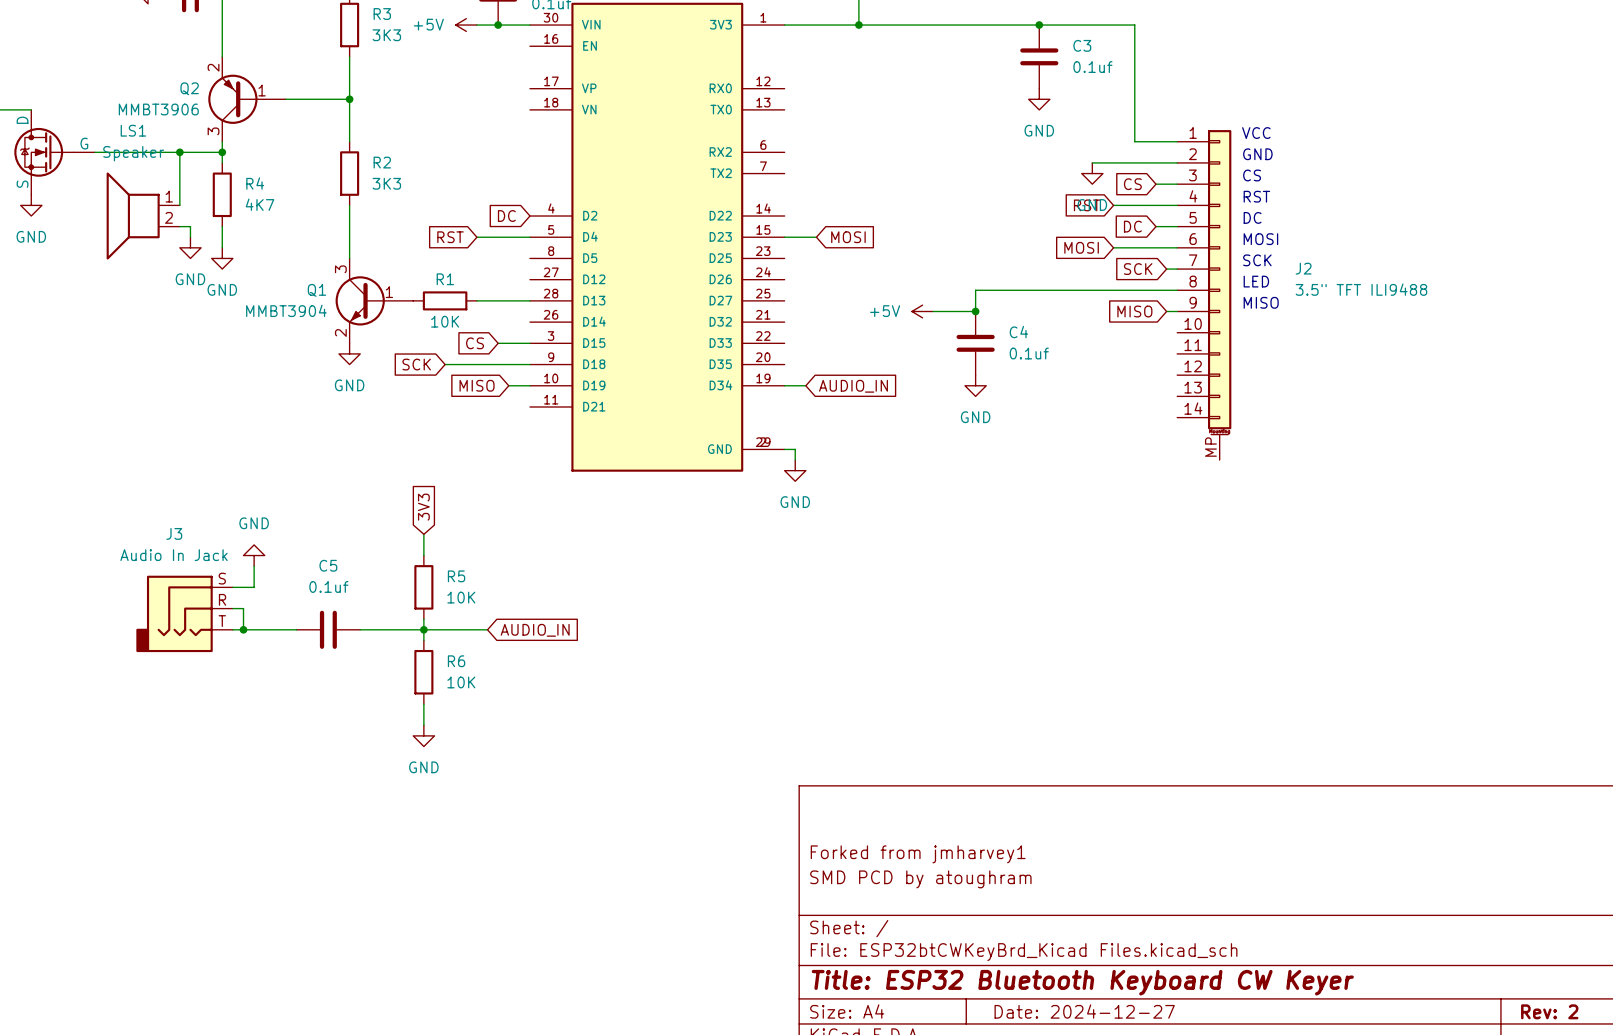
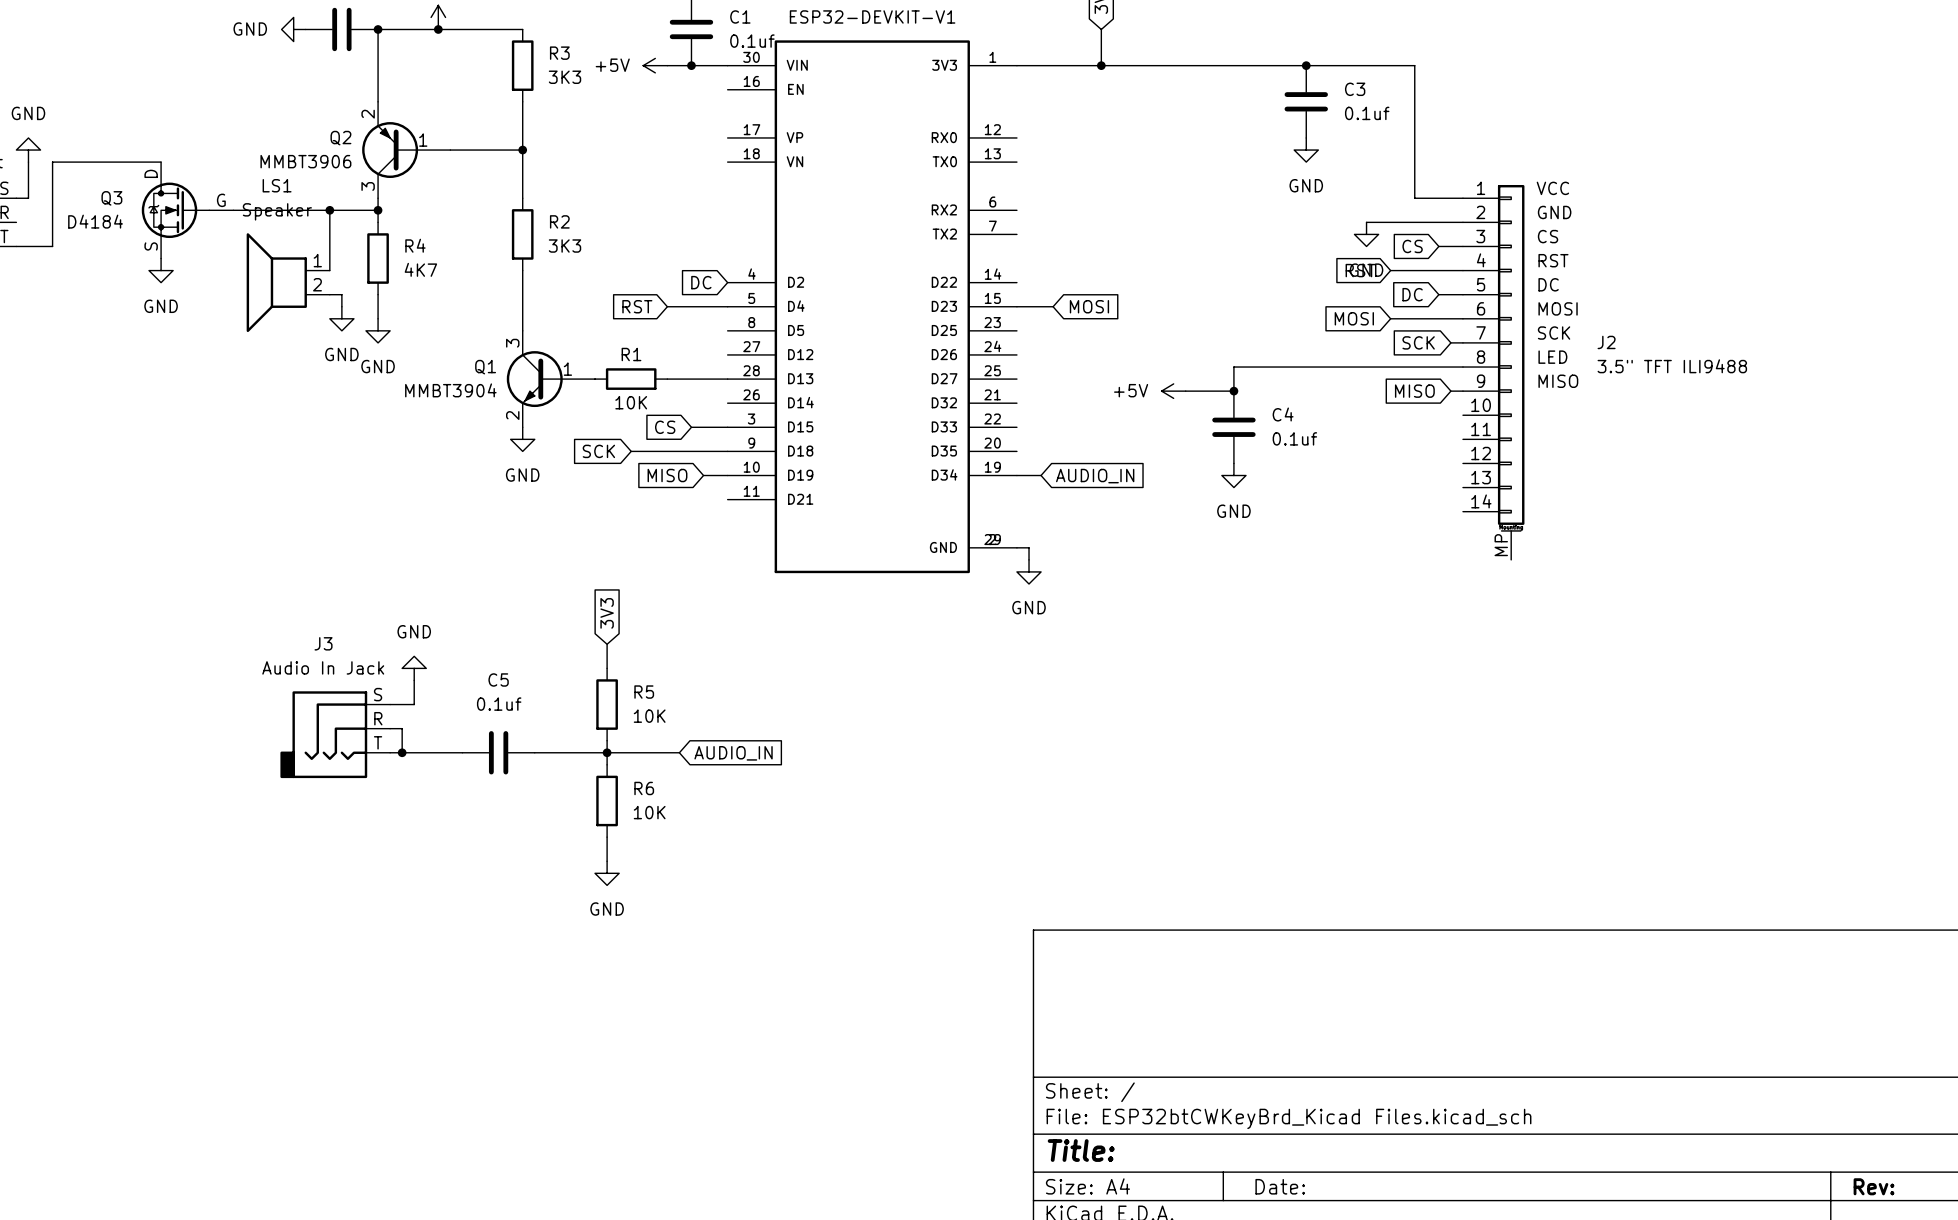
title block: Forked from jmharvey1 (918, 854) -> none
title block: SMD PCD by atoughram (920, 879) -> none
title block: Title: ESP32 Bluetooth Keyboard CW Keyer (1082, 982) -> Title: (1081, 1150)
title block: Date: 2024-12-27 (1084, 1011) -> Date: (1280, 1186)
title block: Rev: 2 (1549, 1011) -> Rev: (1874, 1186)

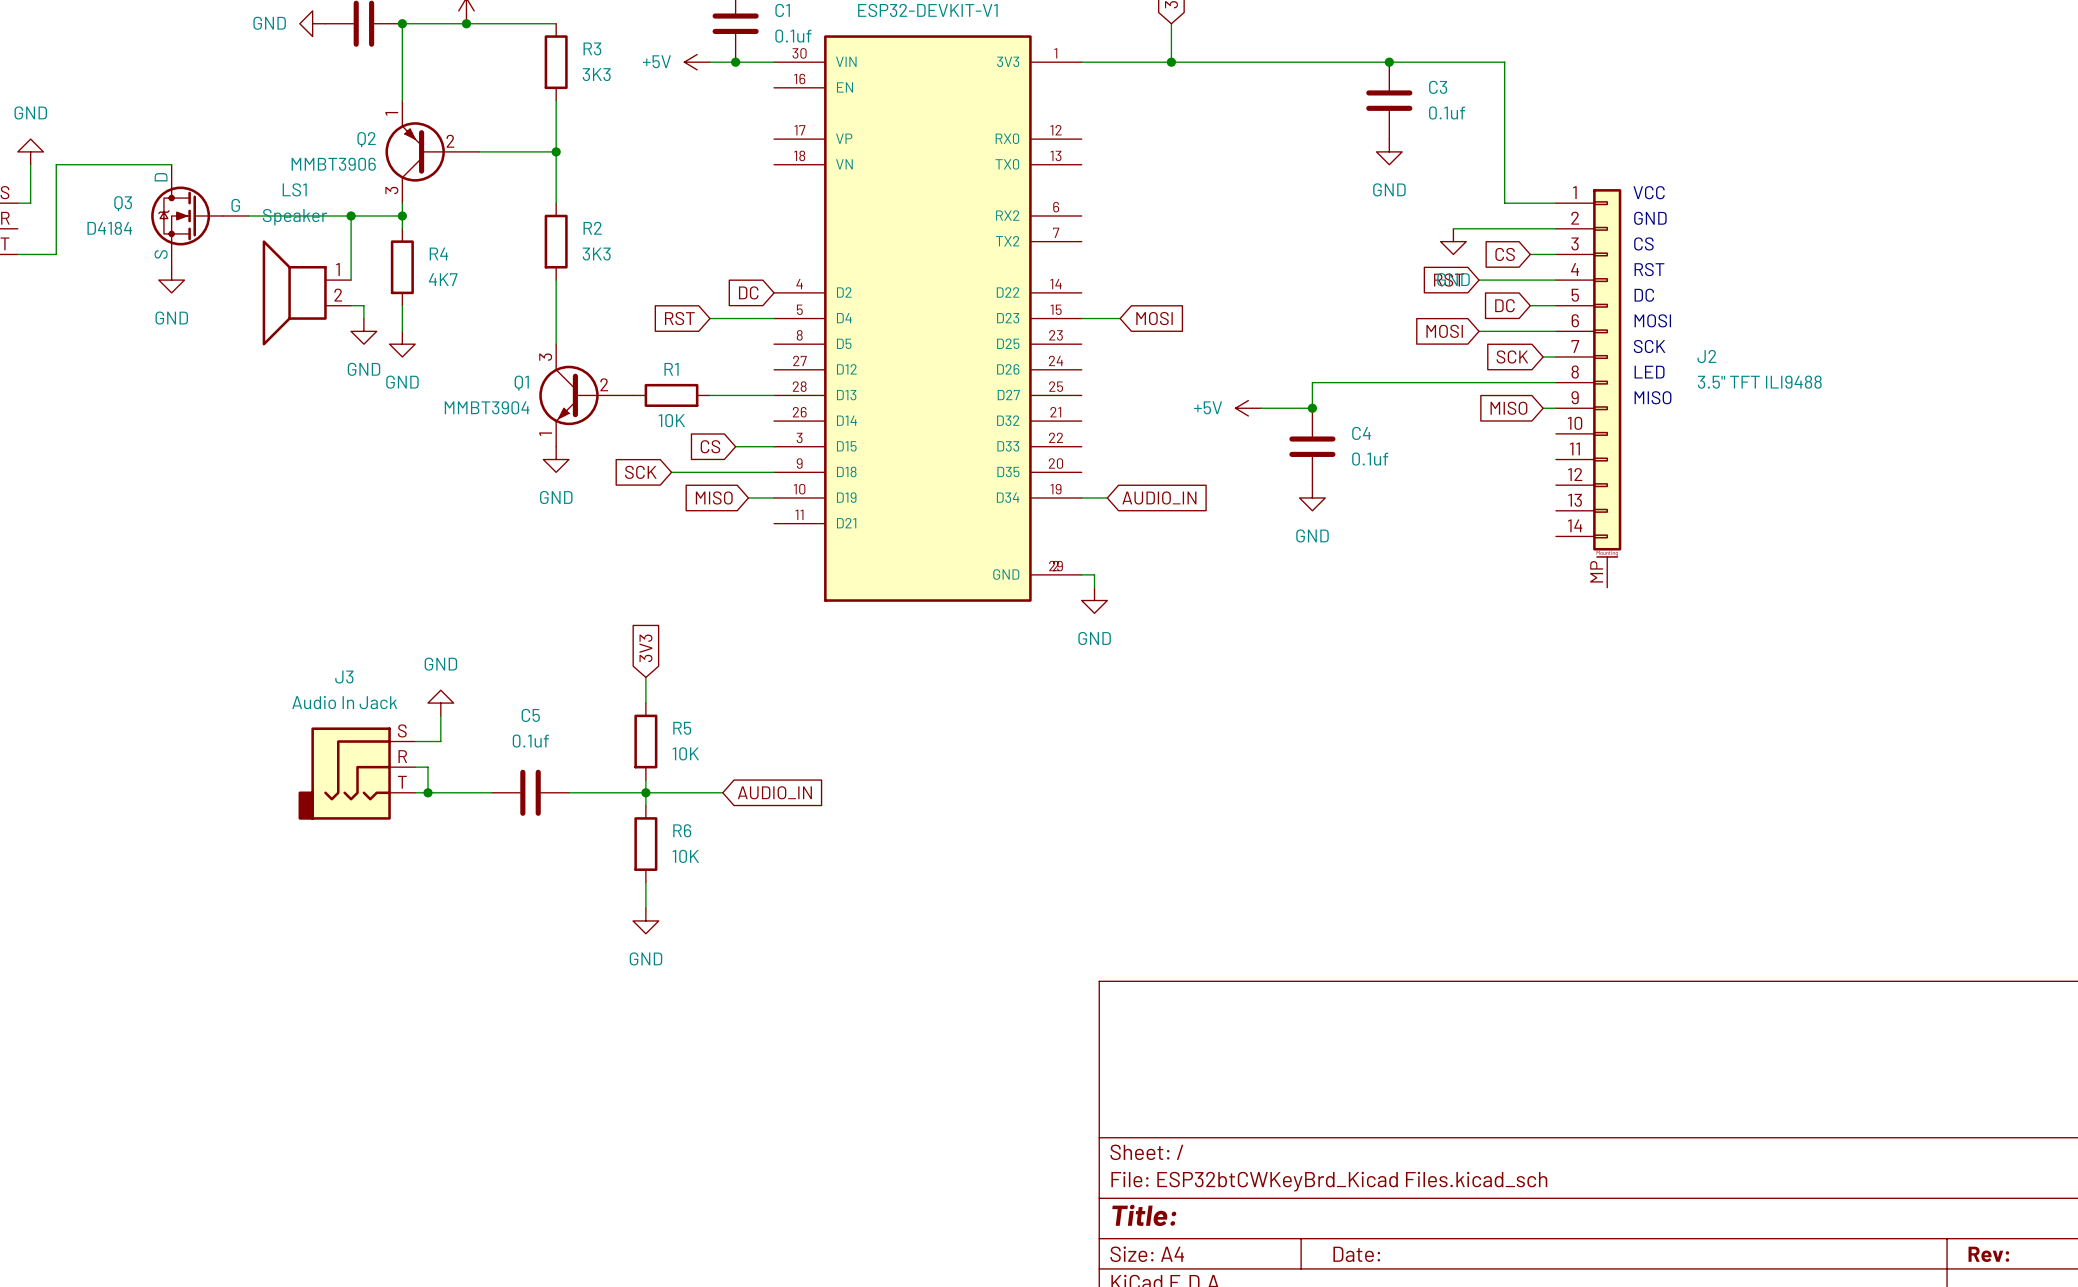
Q2 pin number: 2 (368, 114) -> 1 (391, 113)
Q2 pin number: 1 (423, 140) -> 2 (450, 141)
Q1 pin number: 1 (567, 369) -> 2 (604, 384)
Q1 pin number: 2 (512, 415) -> 1 (545, 434)

